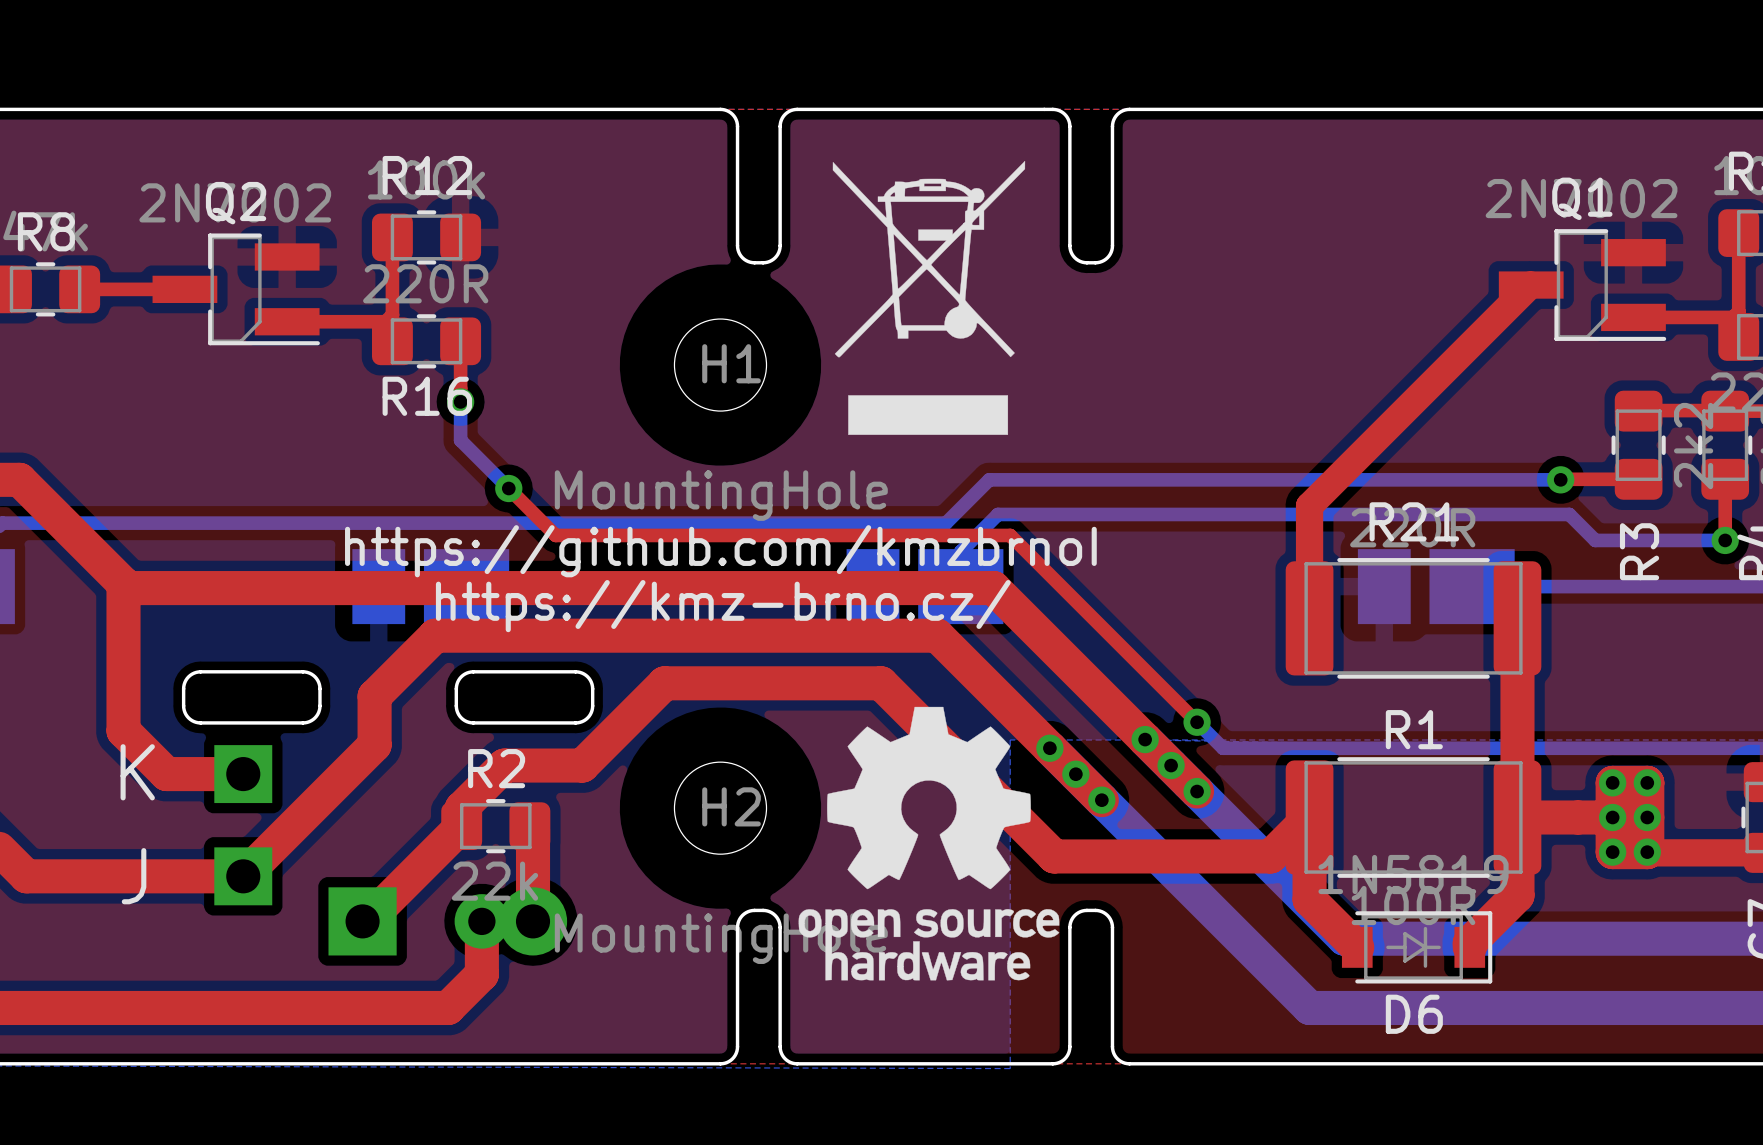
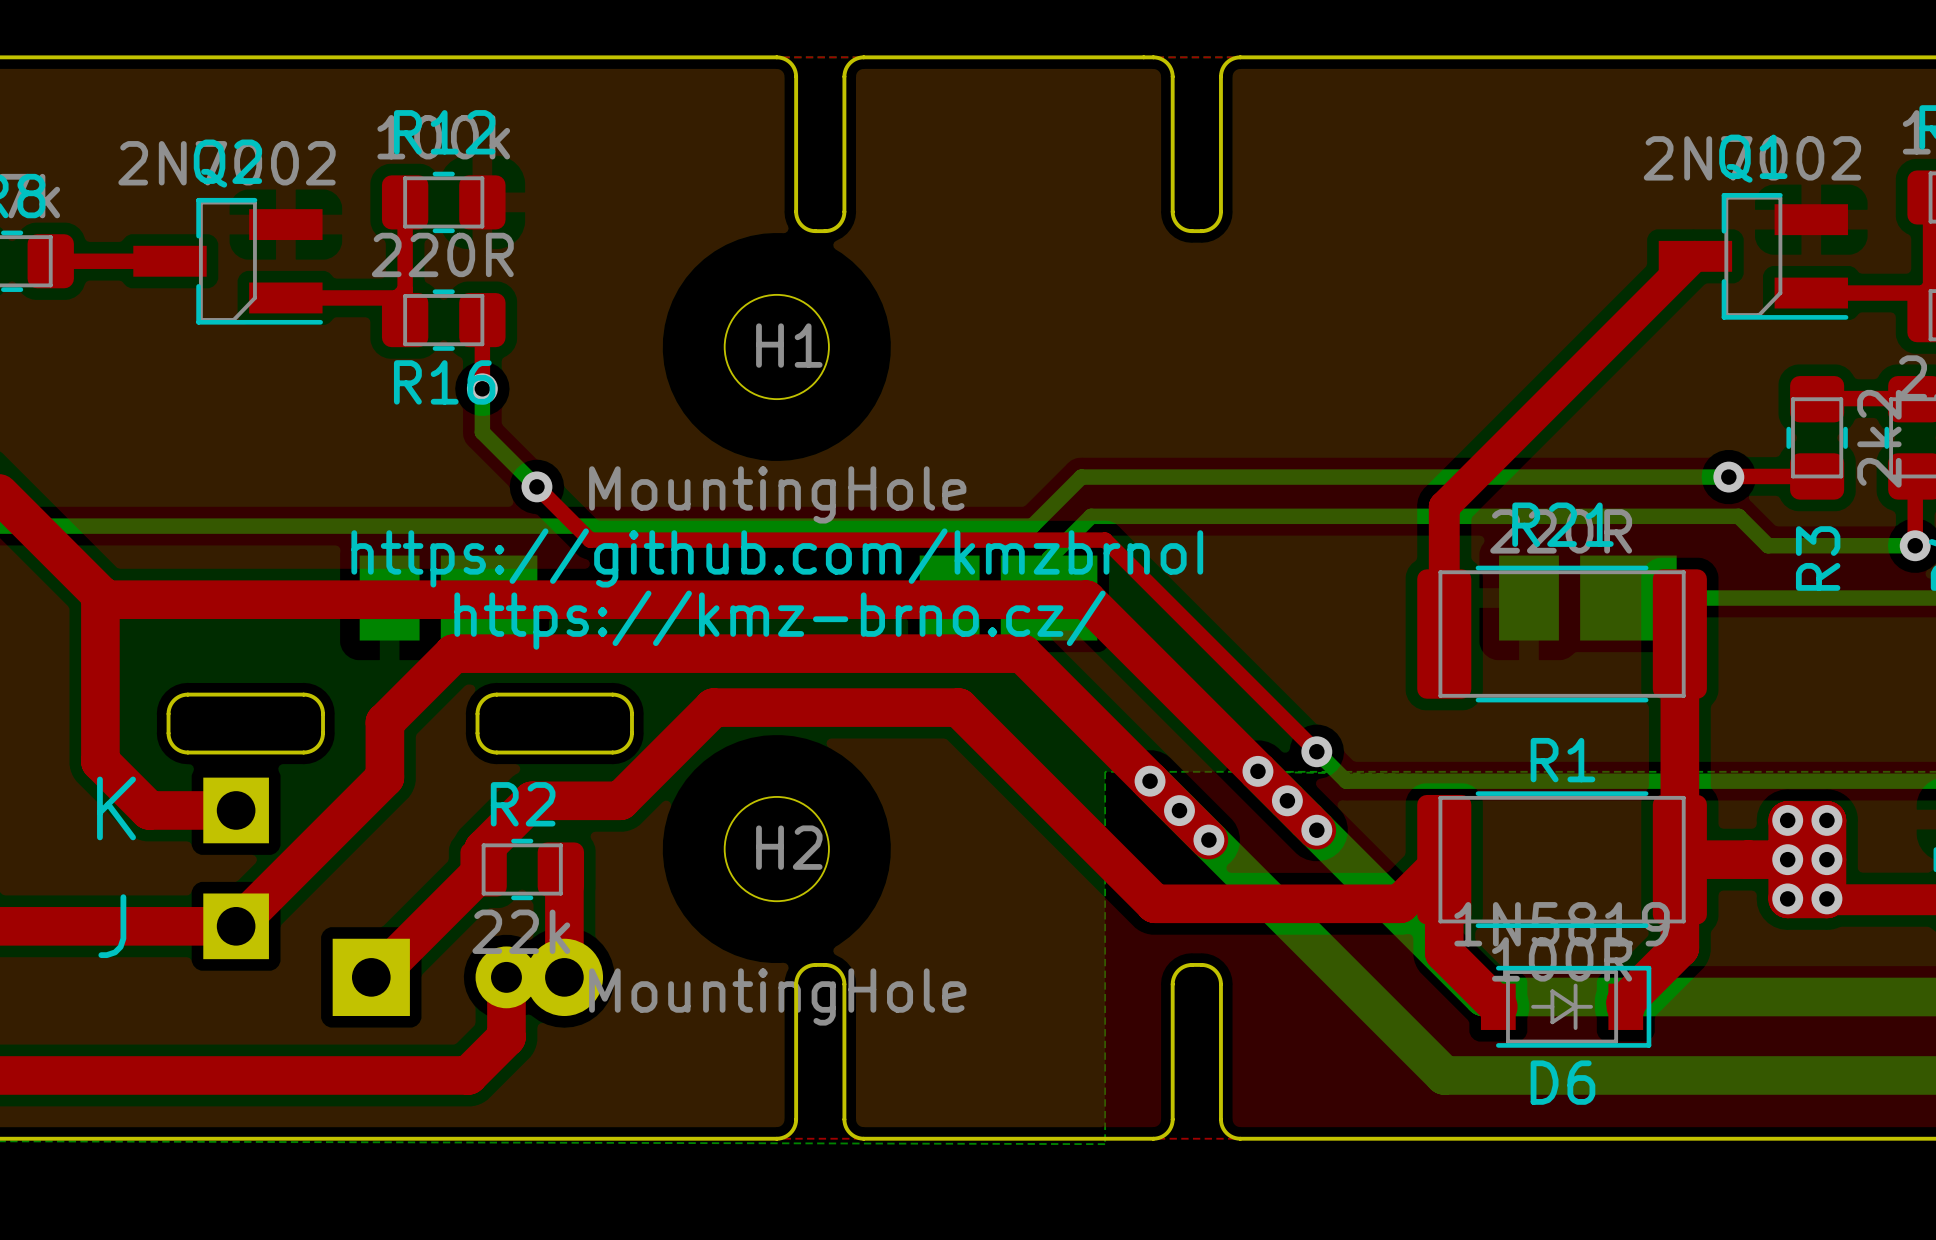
drawing: [832, 160, 1026, 435] -> none
drawing: [798, 706, 1060, 981] -> none

